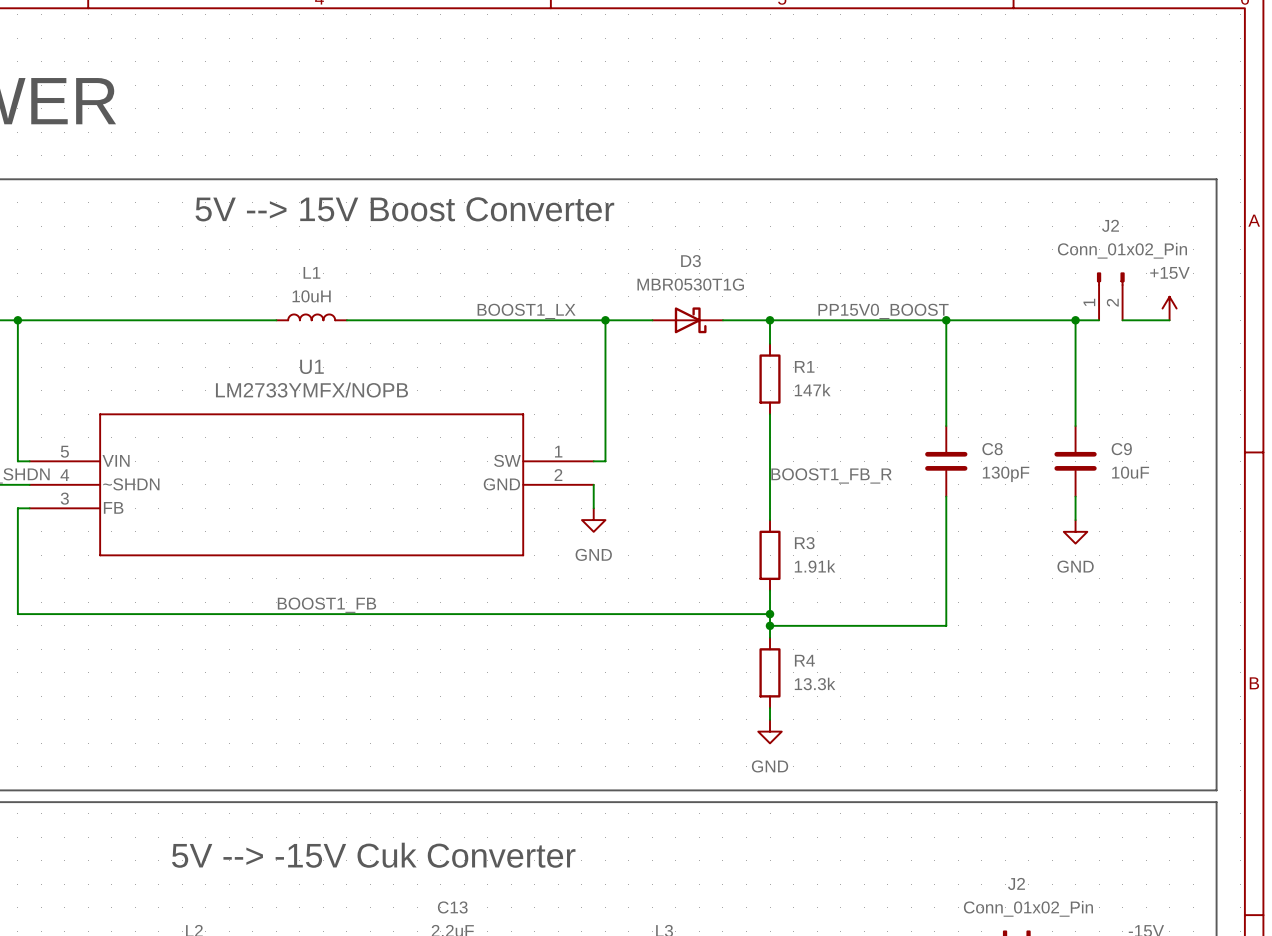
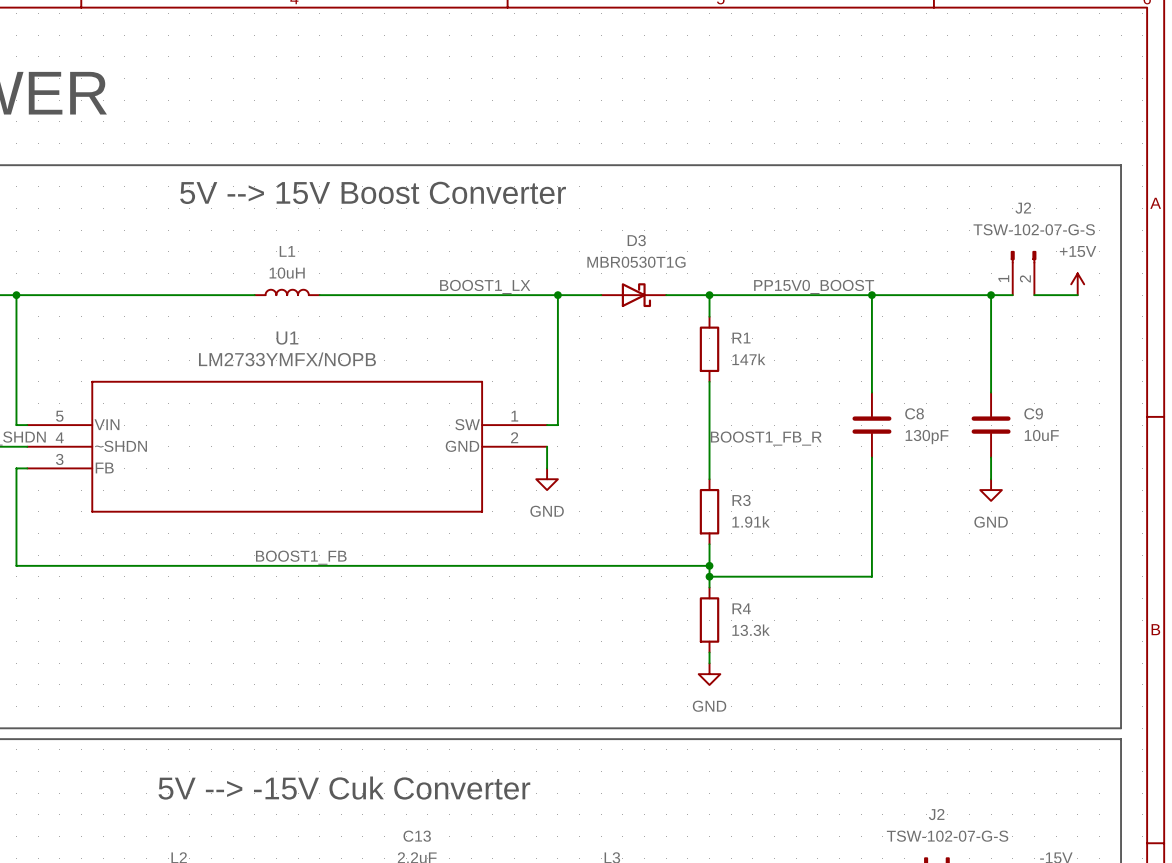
J2 value: Conn_01x02_Pin (1122, 250) -> TSW-102-07-G-S (1034, 229)
J2 value: Conn_01x02_Pin (1028, 908) -> TSW-102-07-G-S (947, 836)

